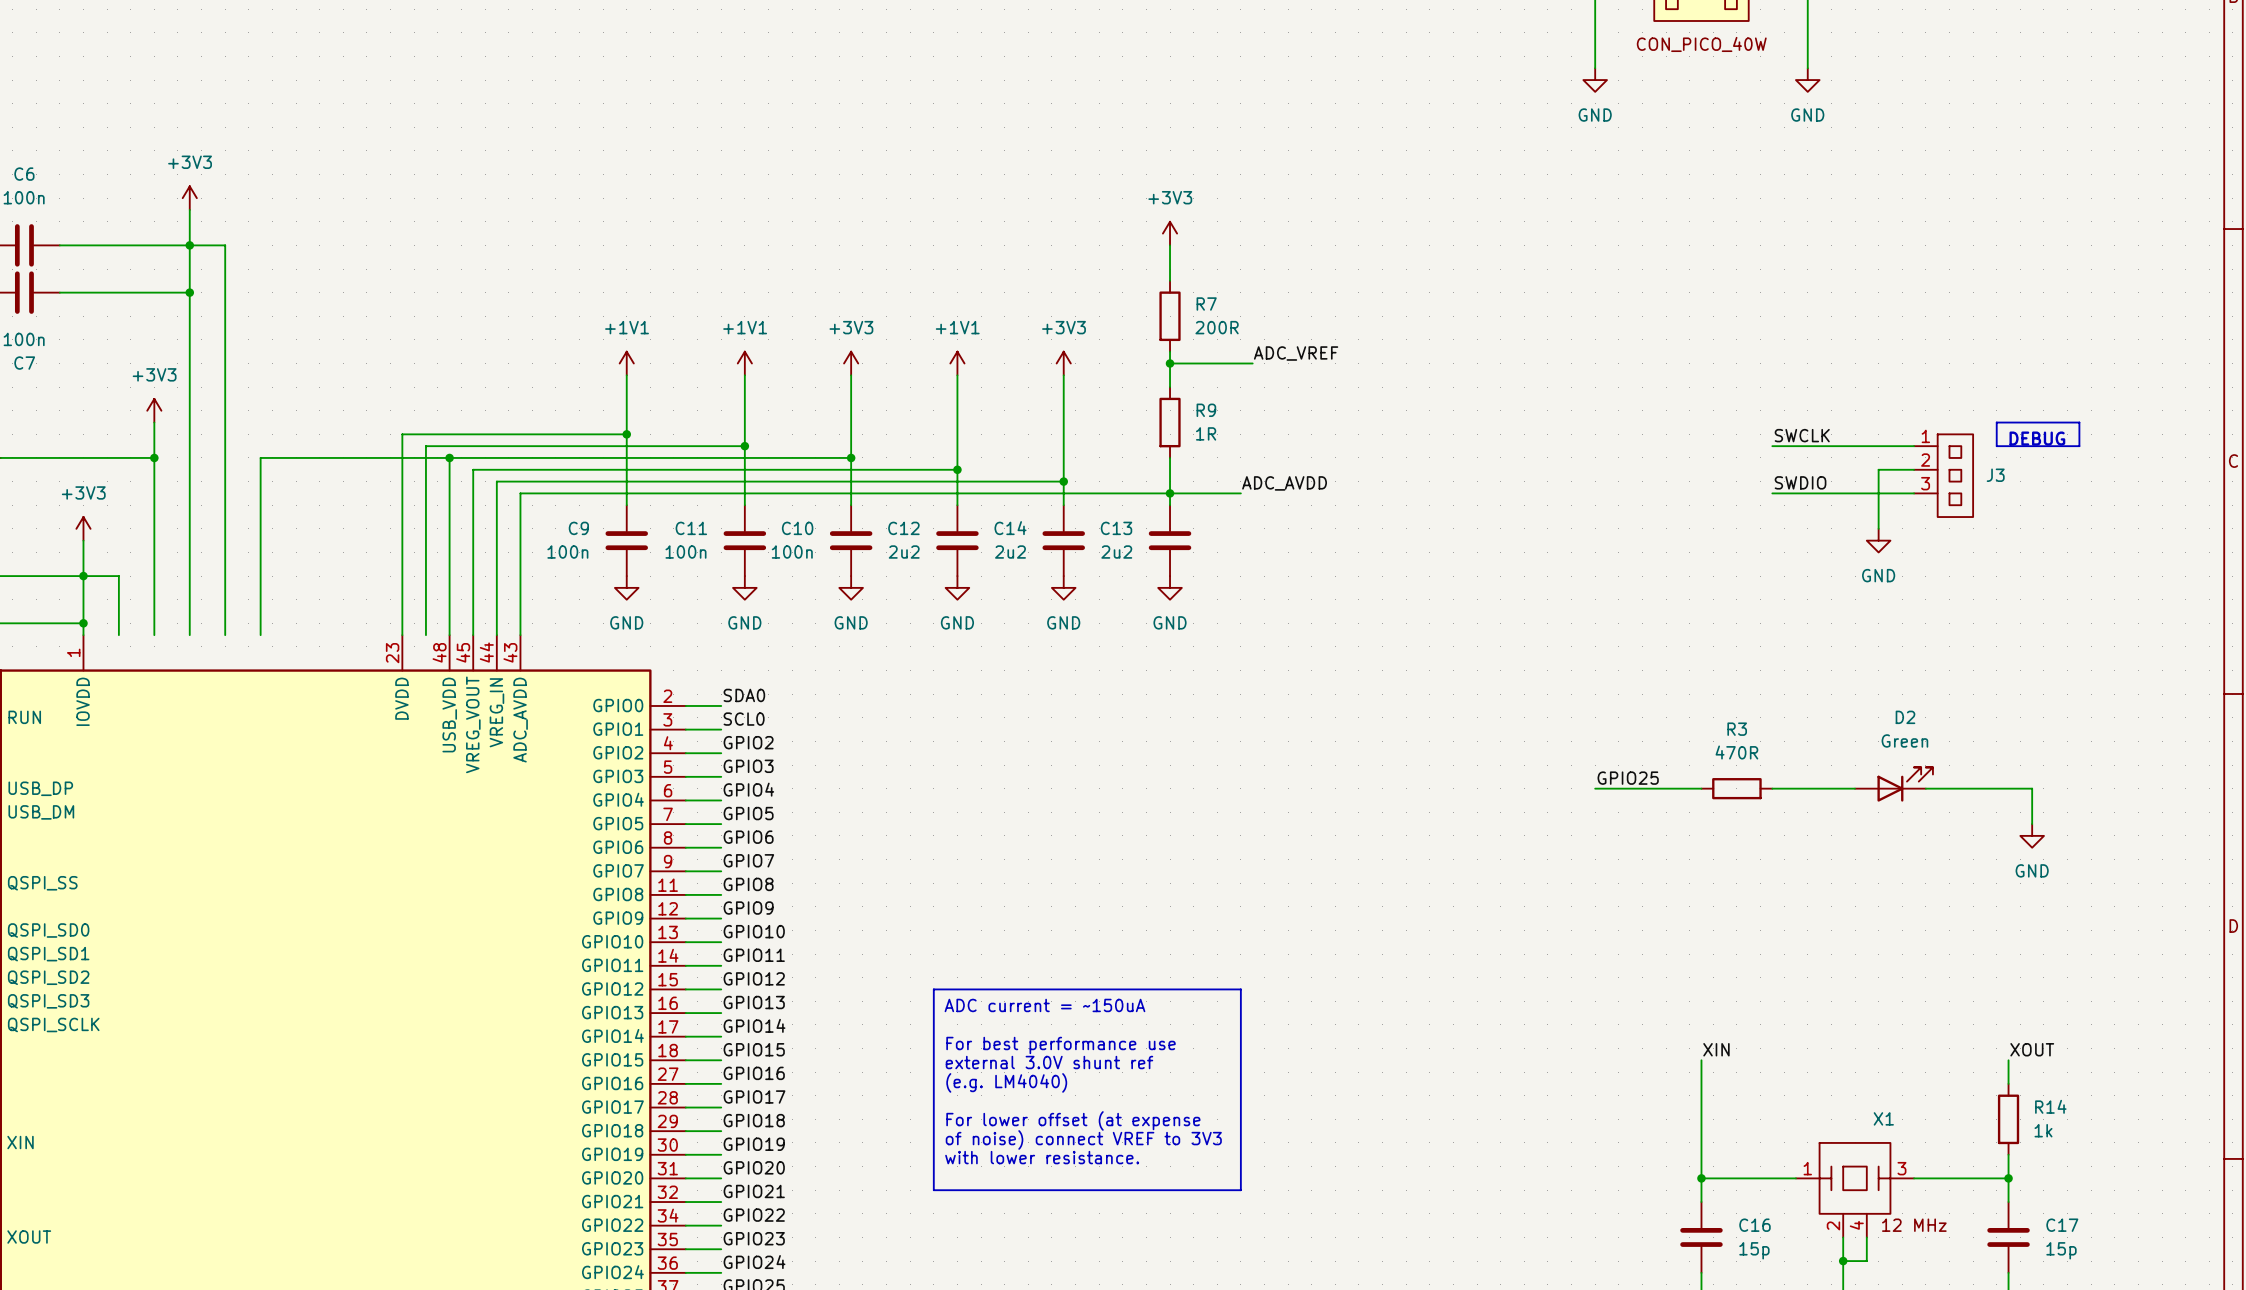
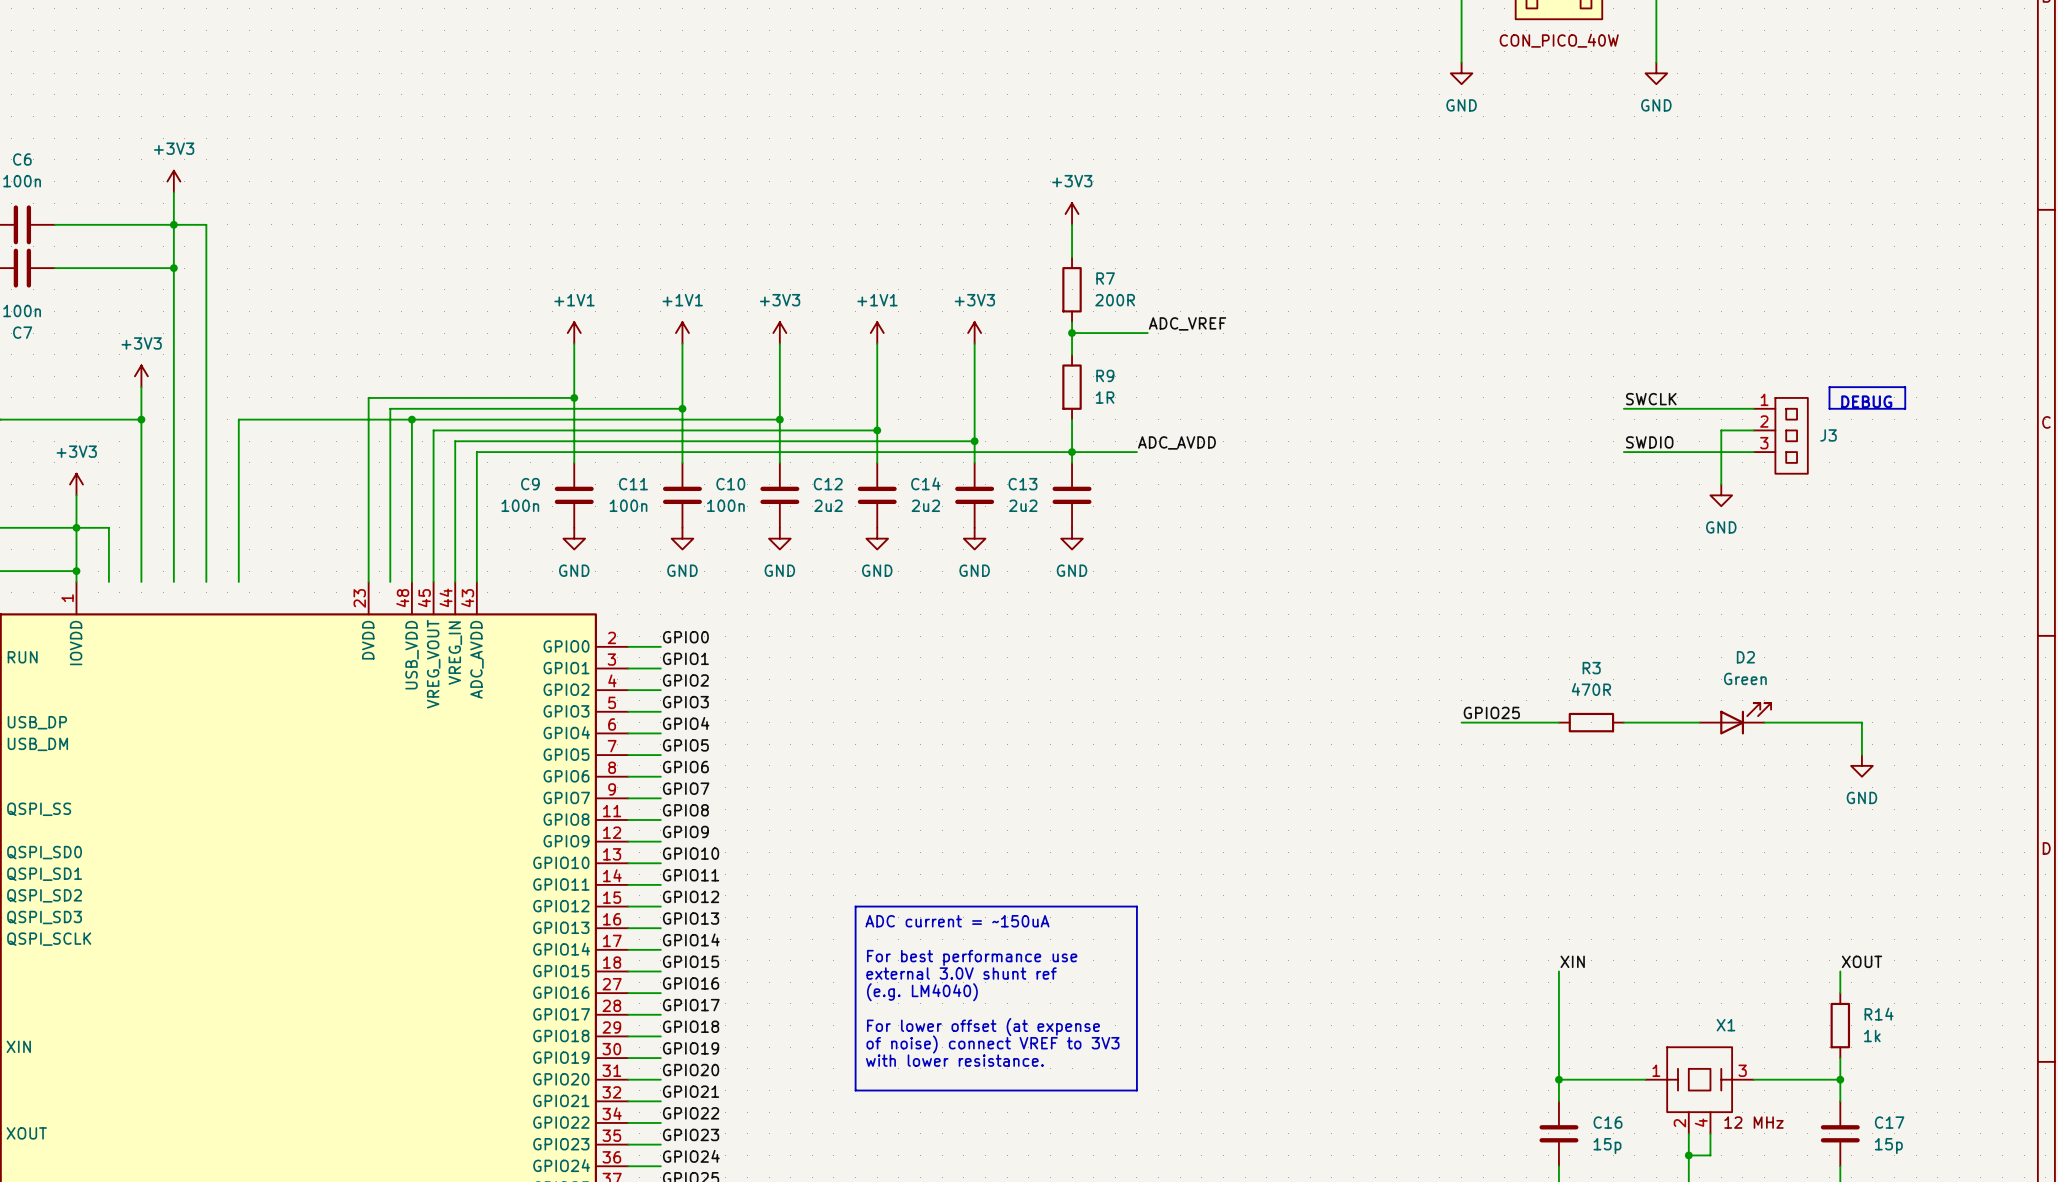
label: SDA0 (744, 695) -> GPIO0 (685, 637)
label: SCL0 (744, 719) -> GPIO1 (685, 658)

